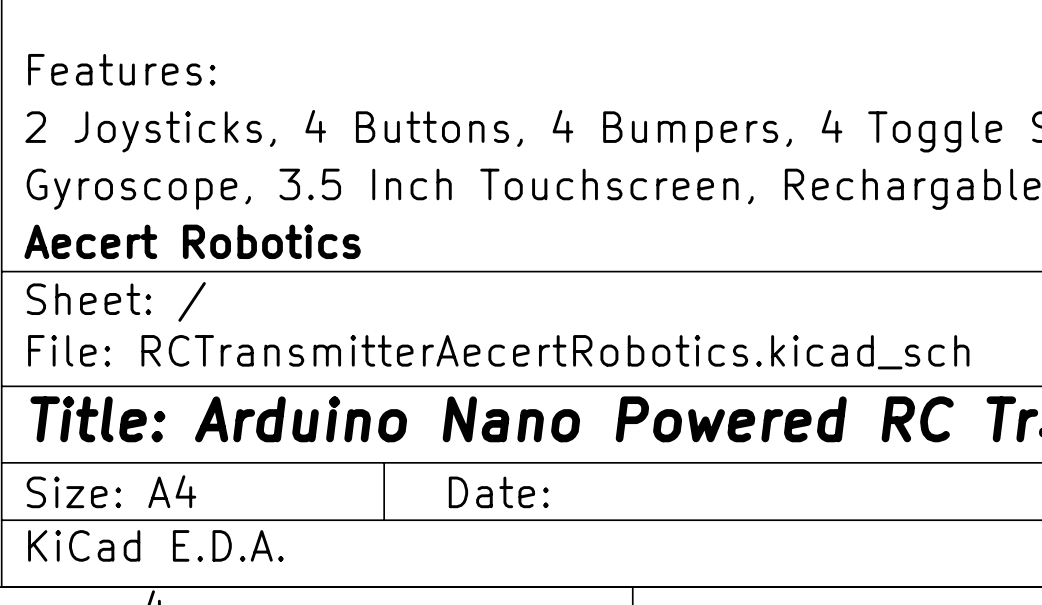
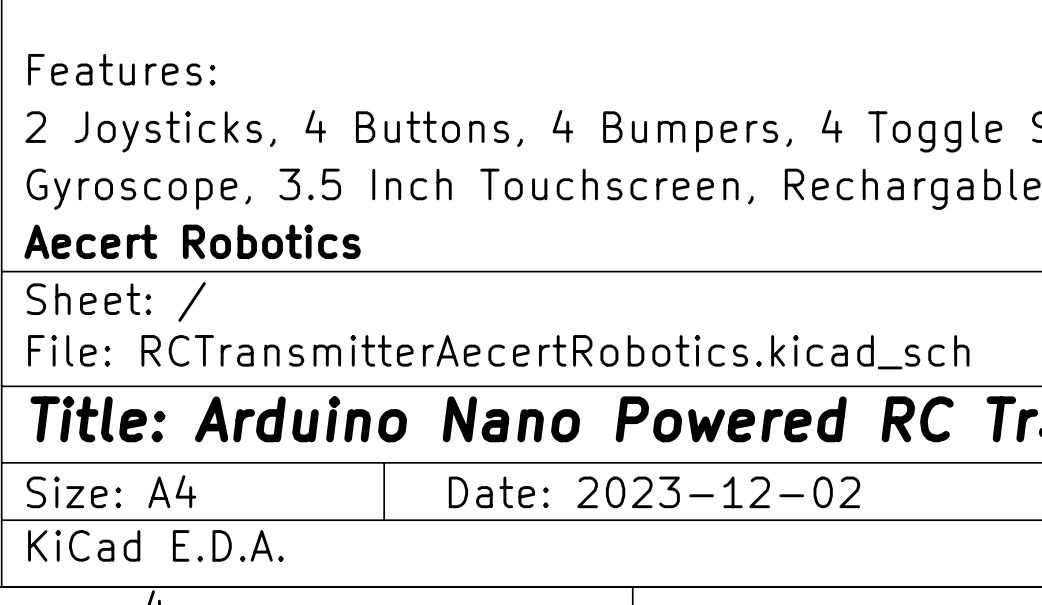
title block: Date: (498, 492) -> Date: 2023-12-02 (654, 492)

